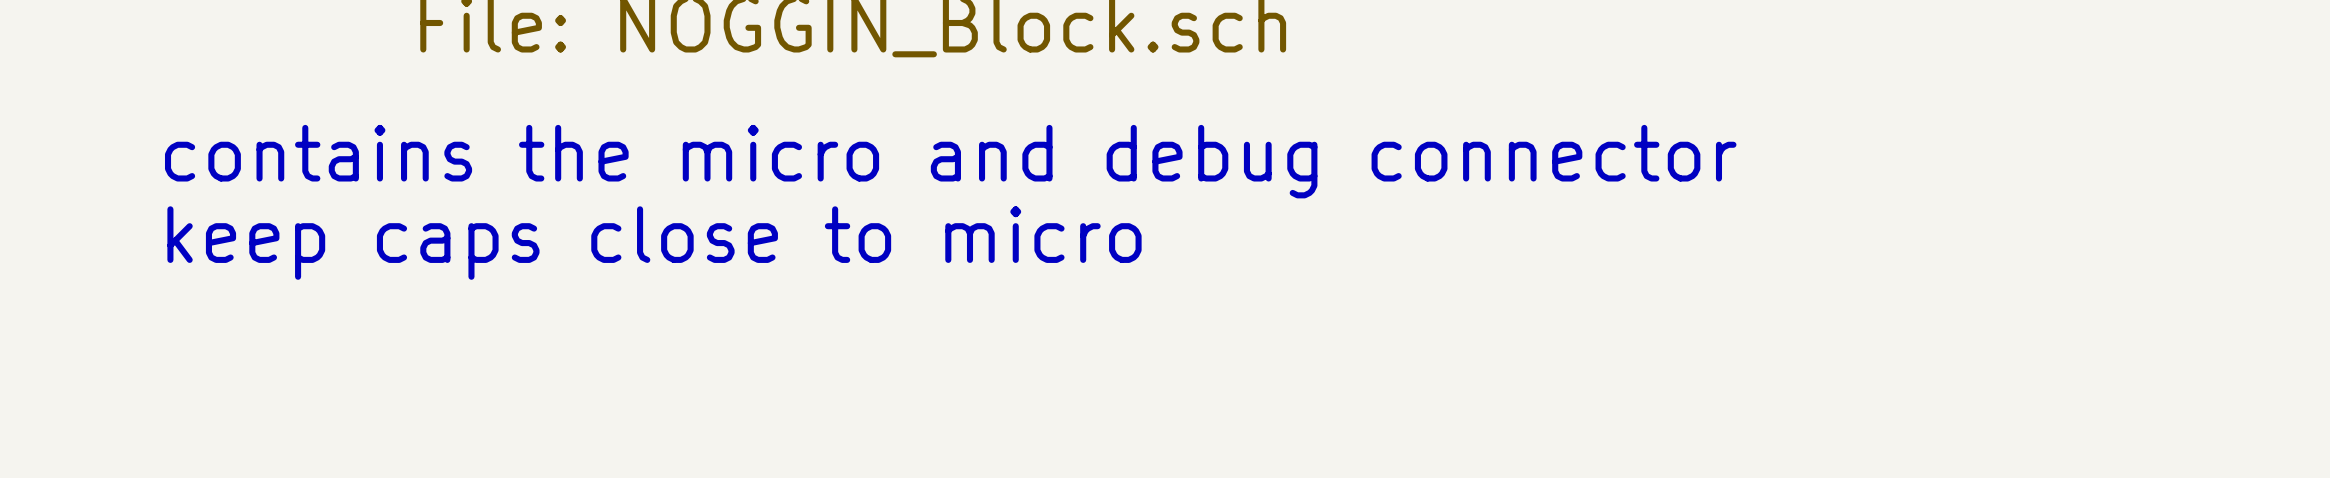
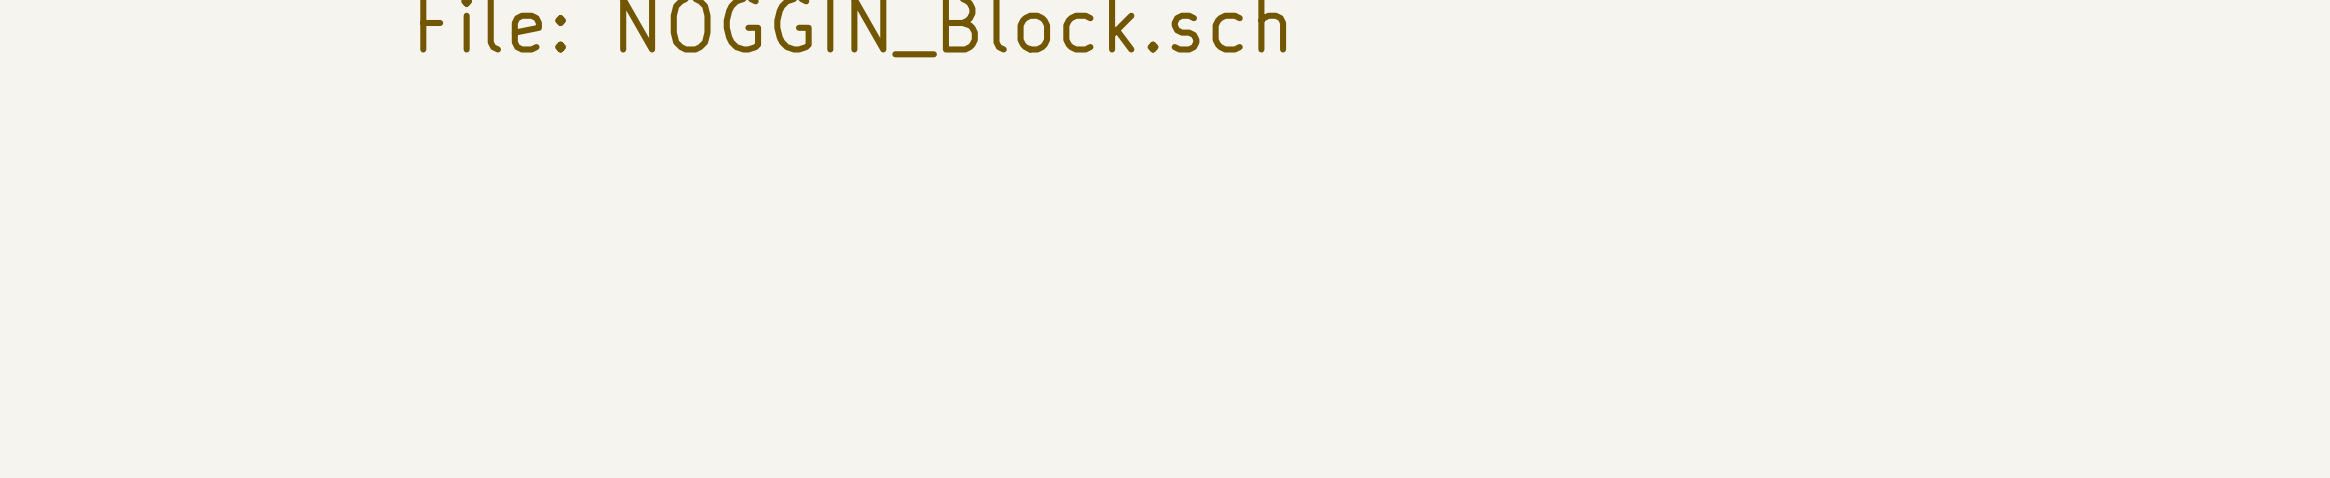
text: contains the micro and debug connector (950, 161) -> none
text: keep caps close to micro (654, 243) -> none

